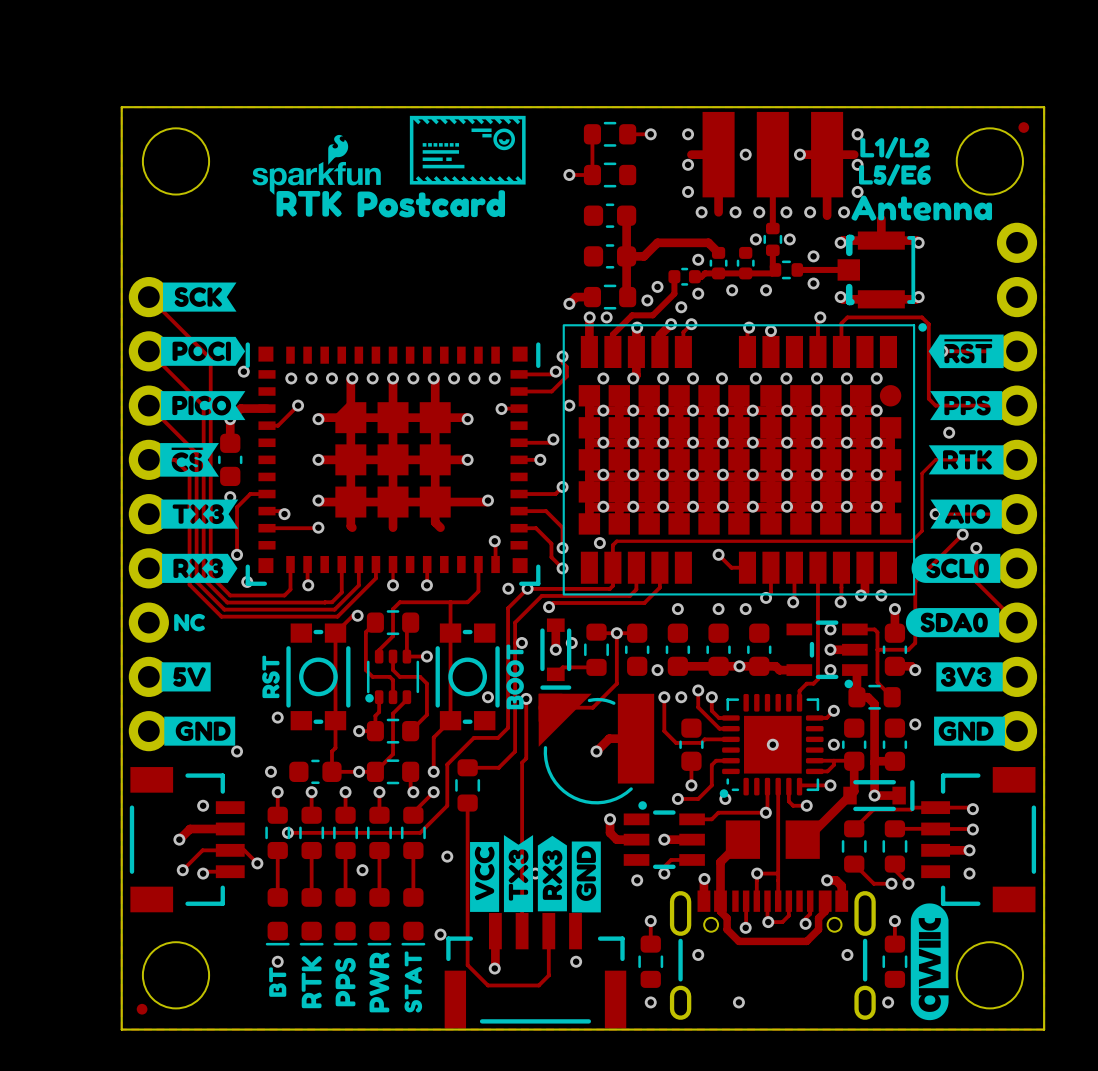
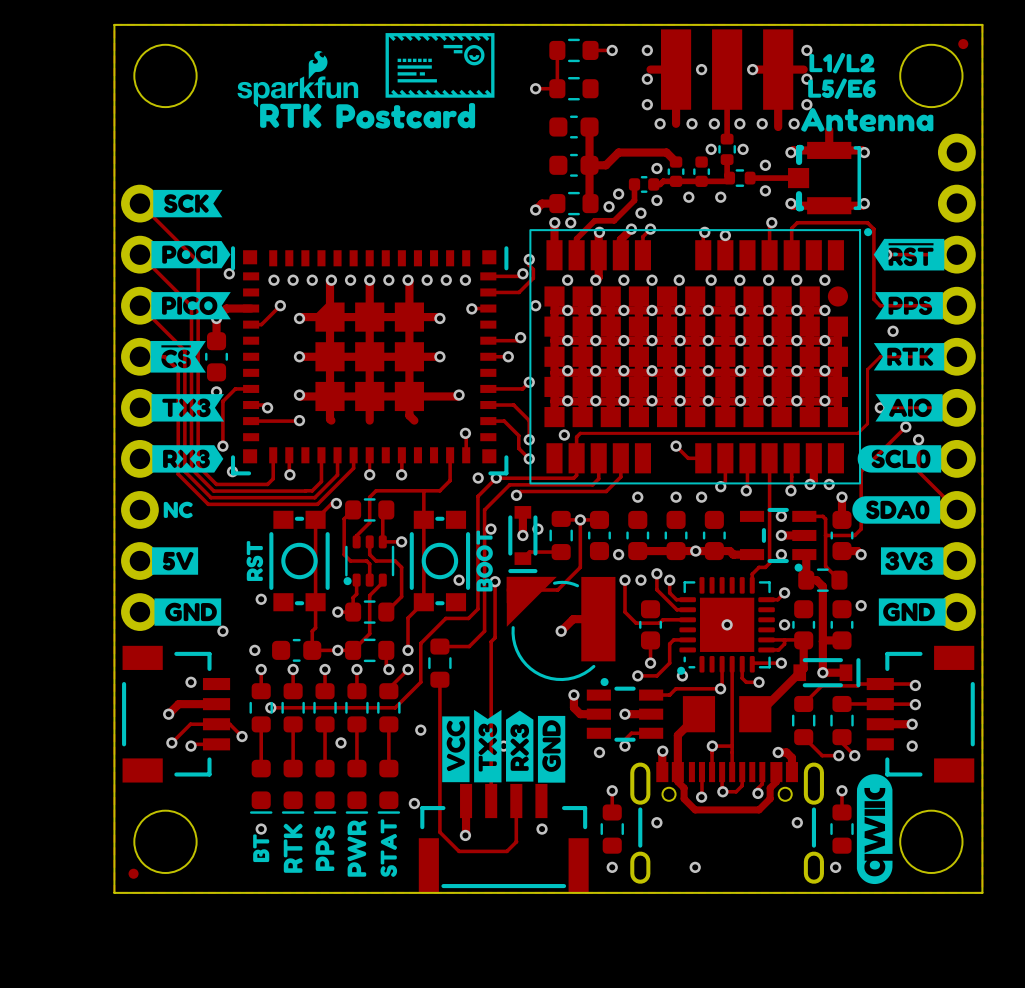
part footprint: [444, 912, 627, 1029] -> [418, 783, 589, 893]

